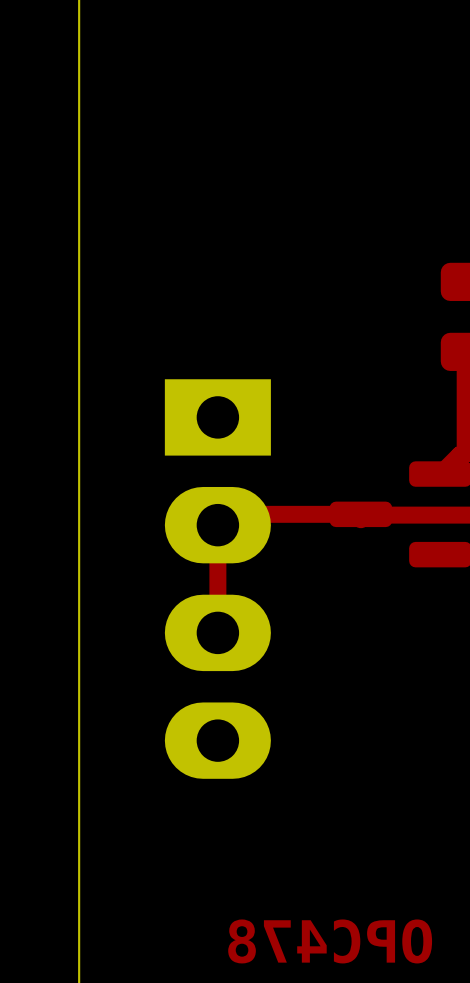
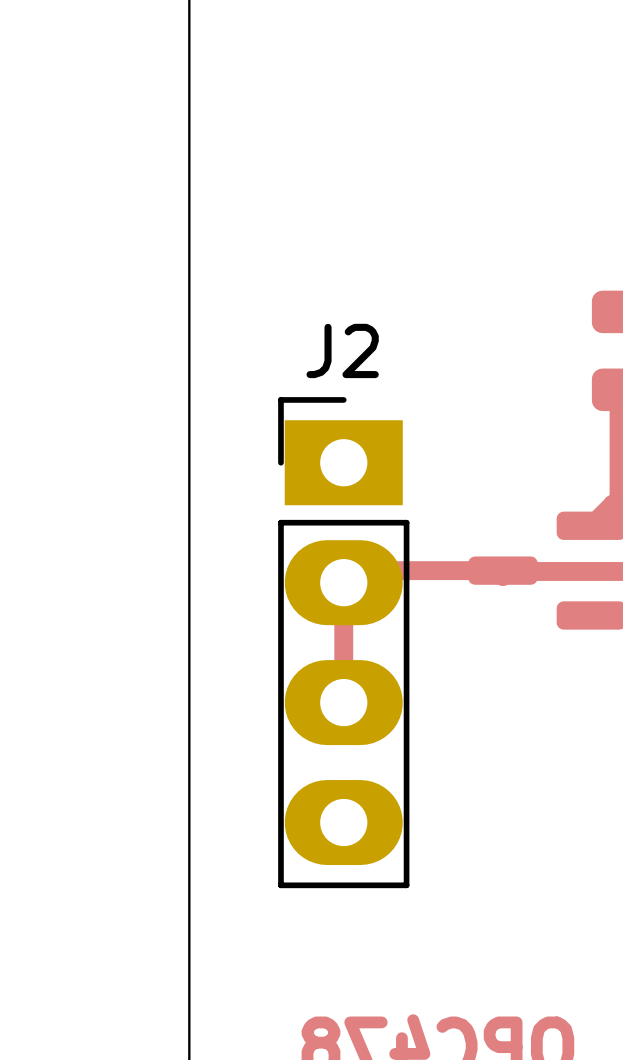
J2 side: top (217, 579) -> bottom (343, 642)

